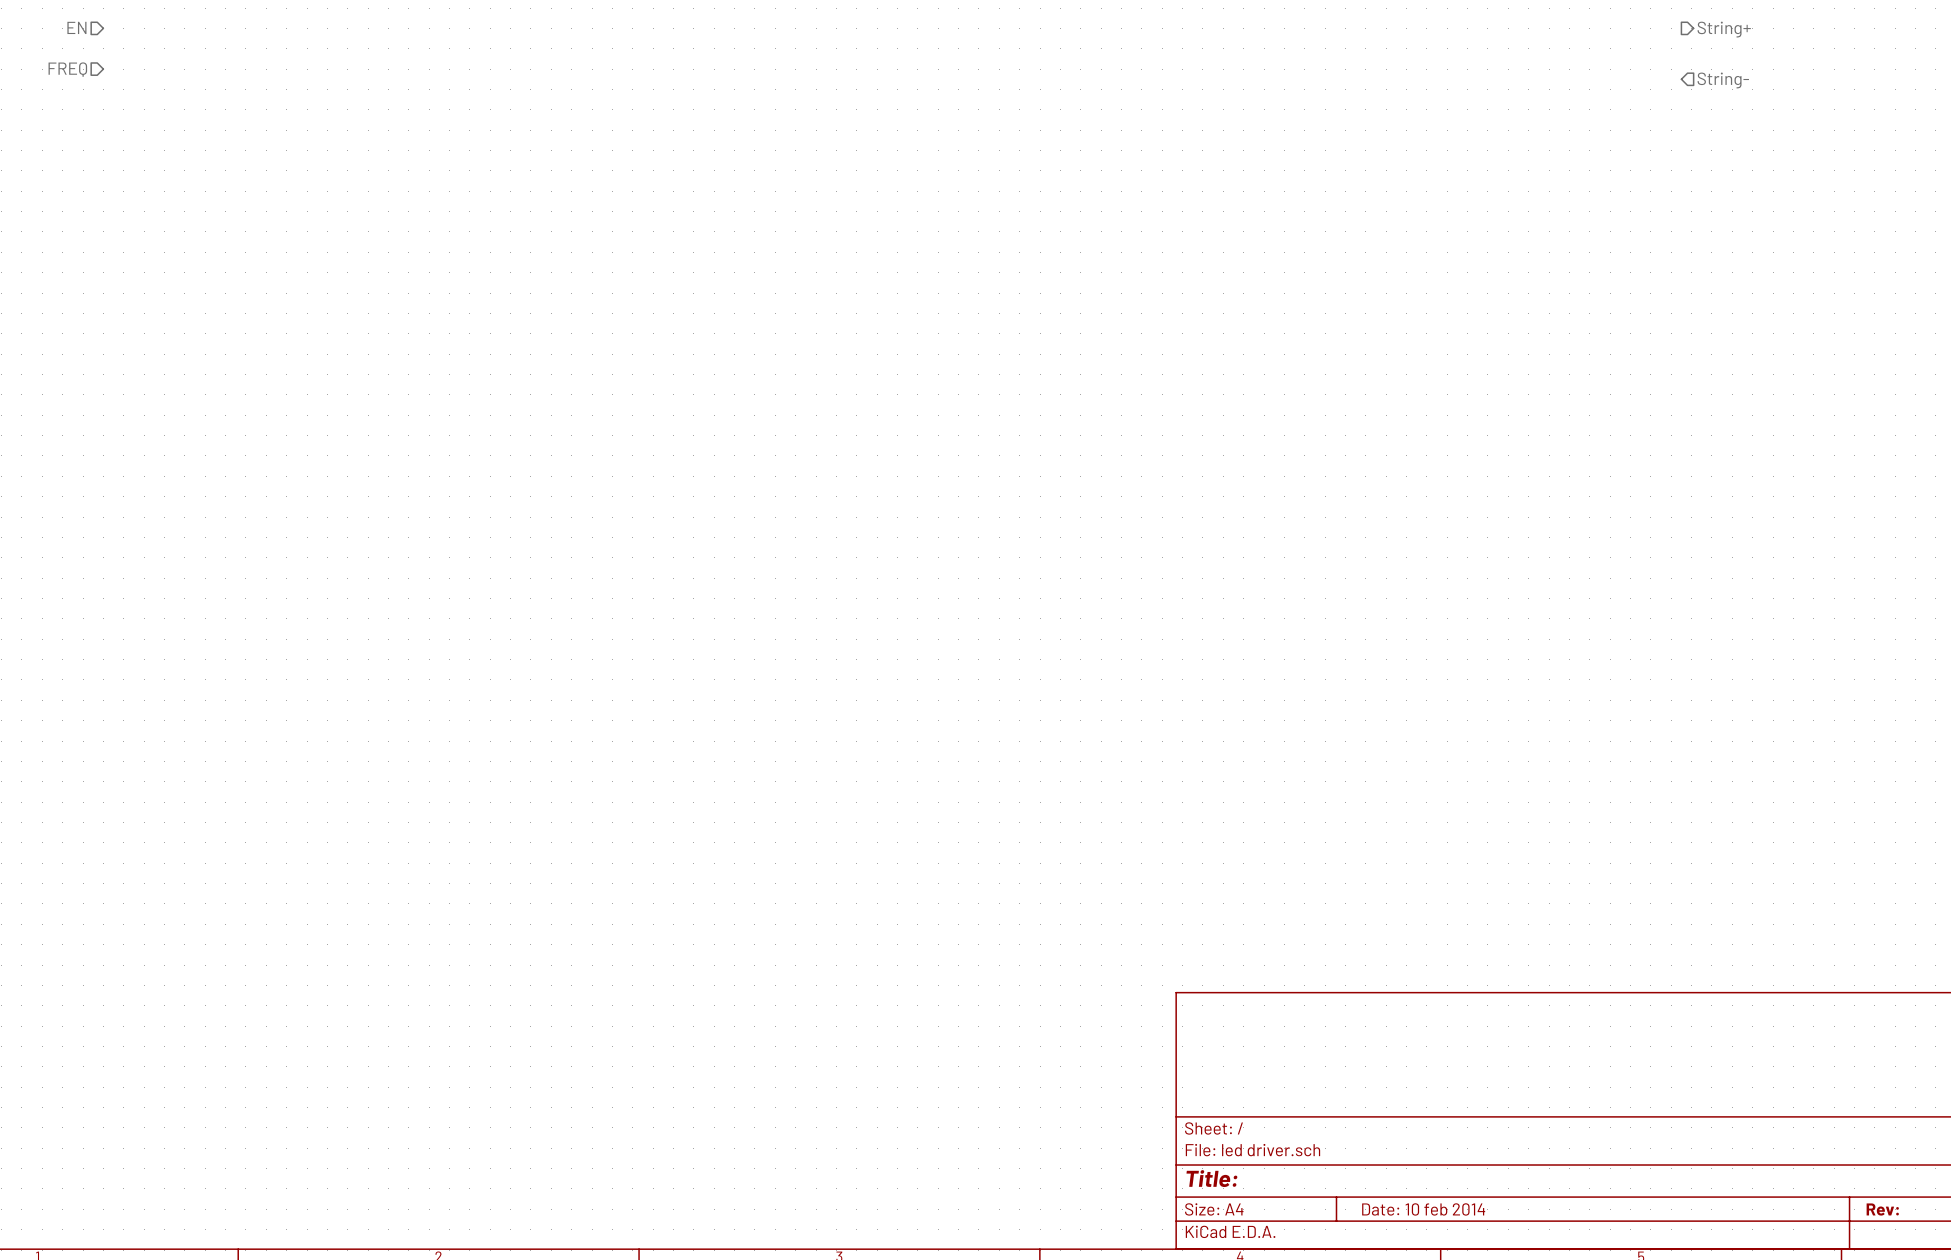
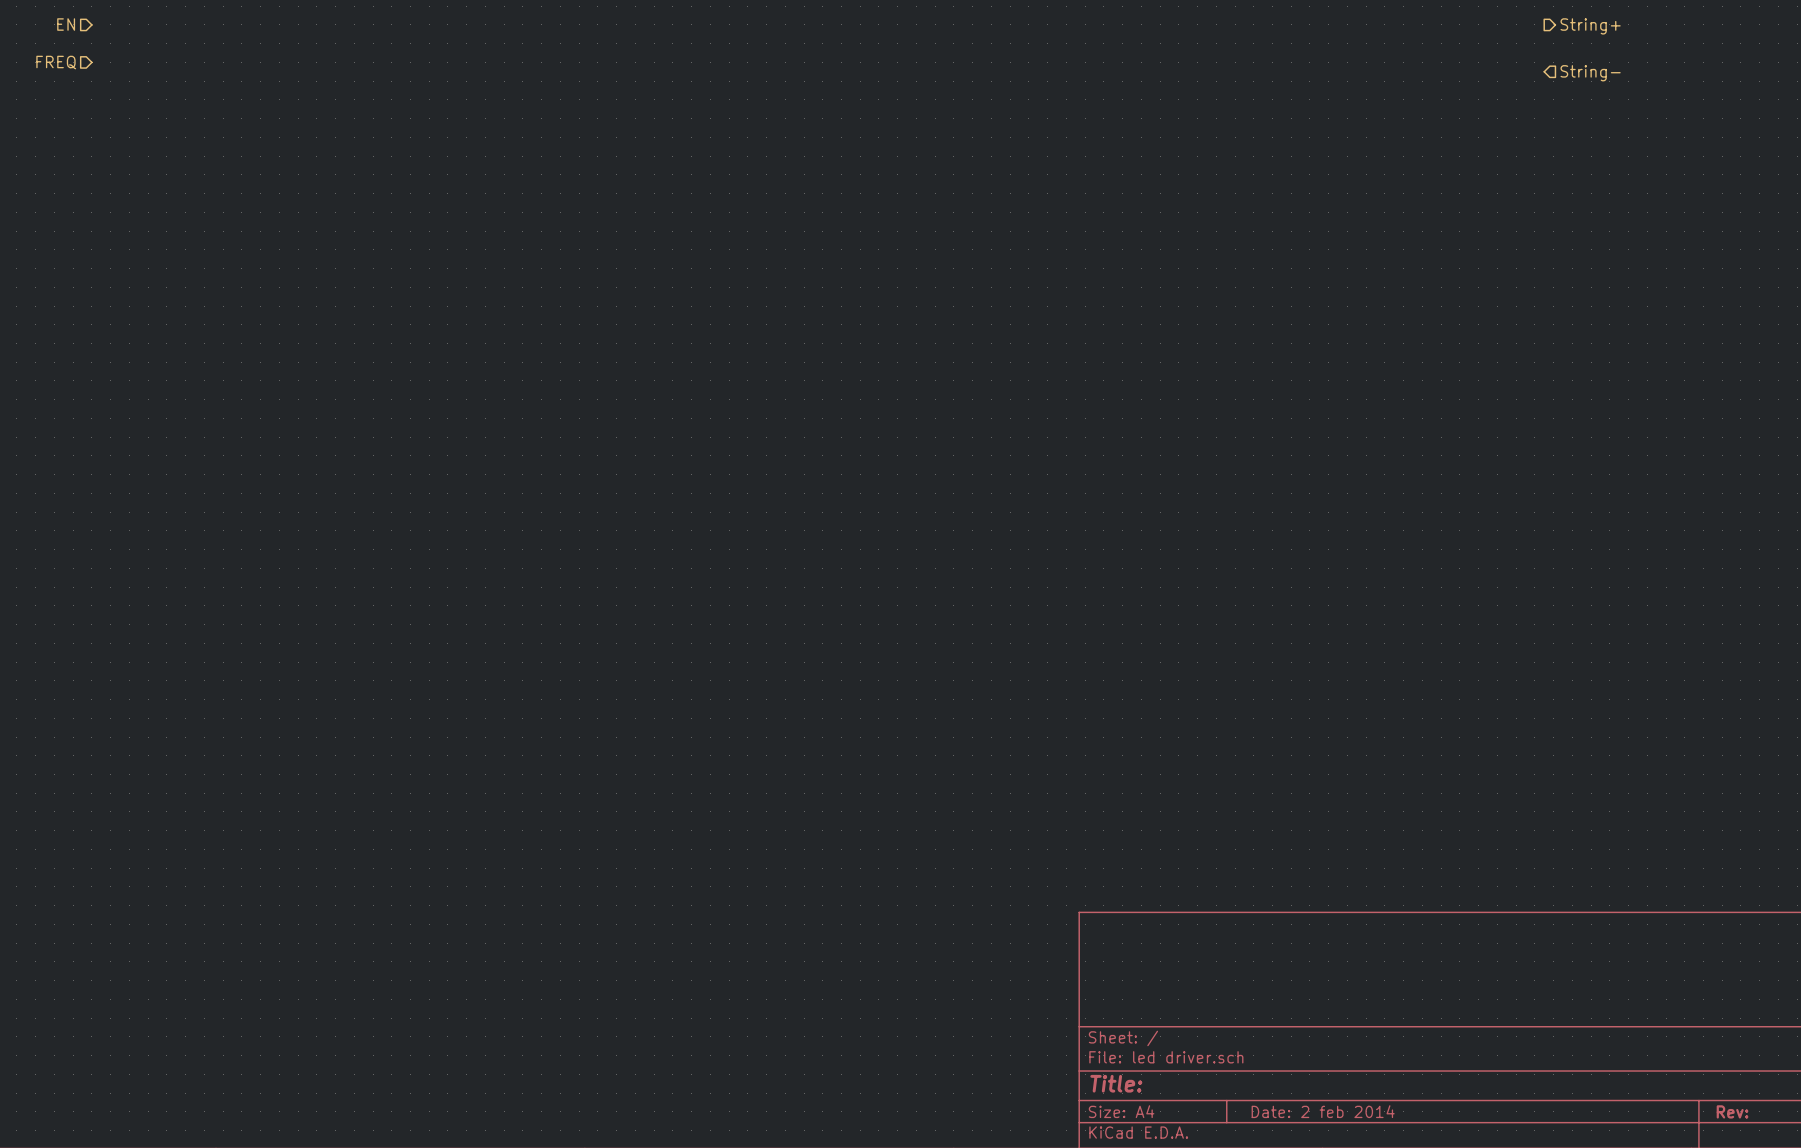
title block: Date: 10 feb 2014 (1423, 1209) -> Date: 2 feb 2014 (1323, 1111)

